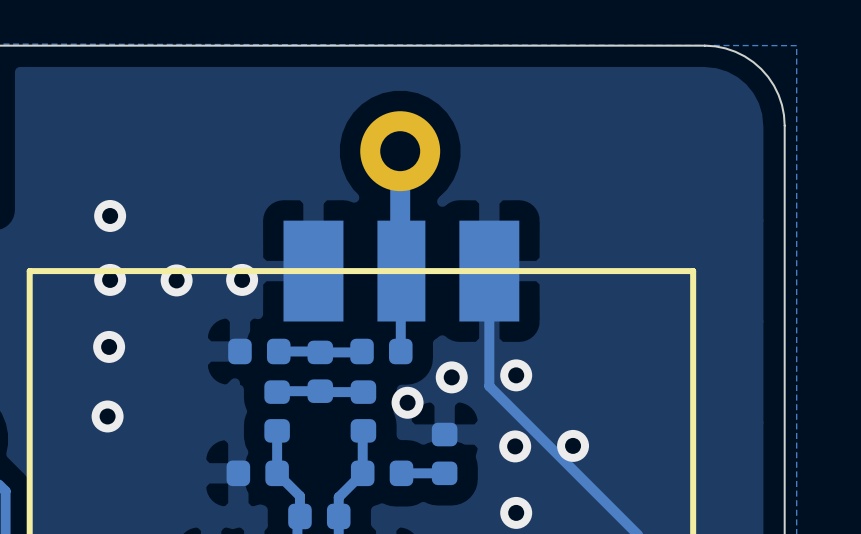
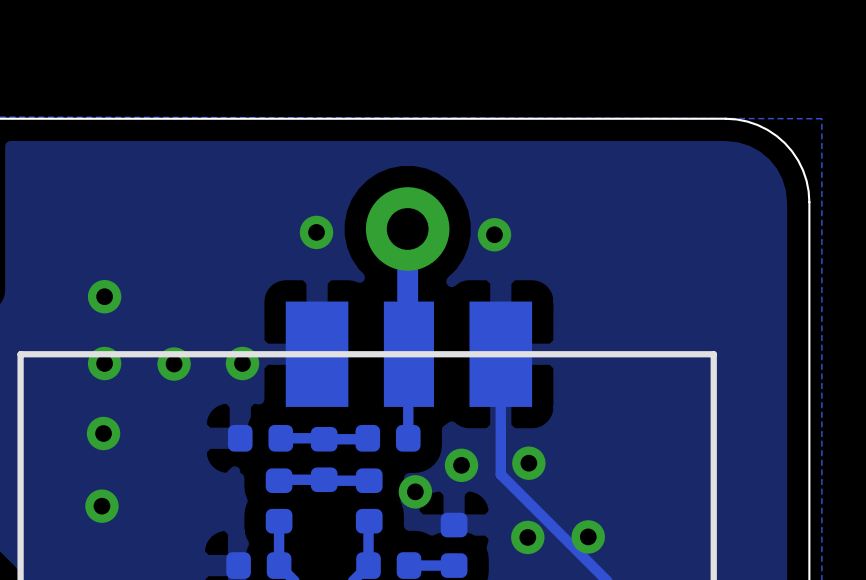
via: none -> (316, 232)
via: none -> (494, 234)

